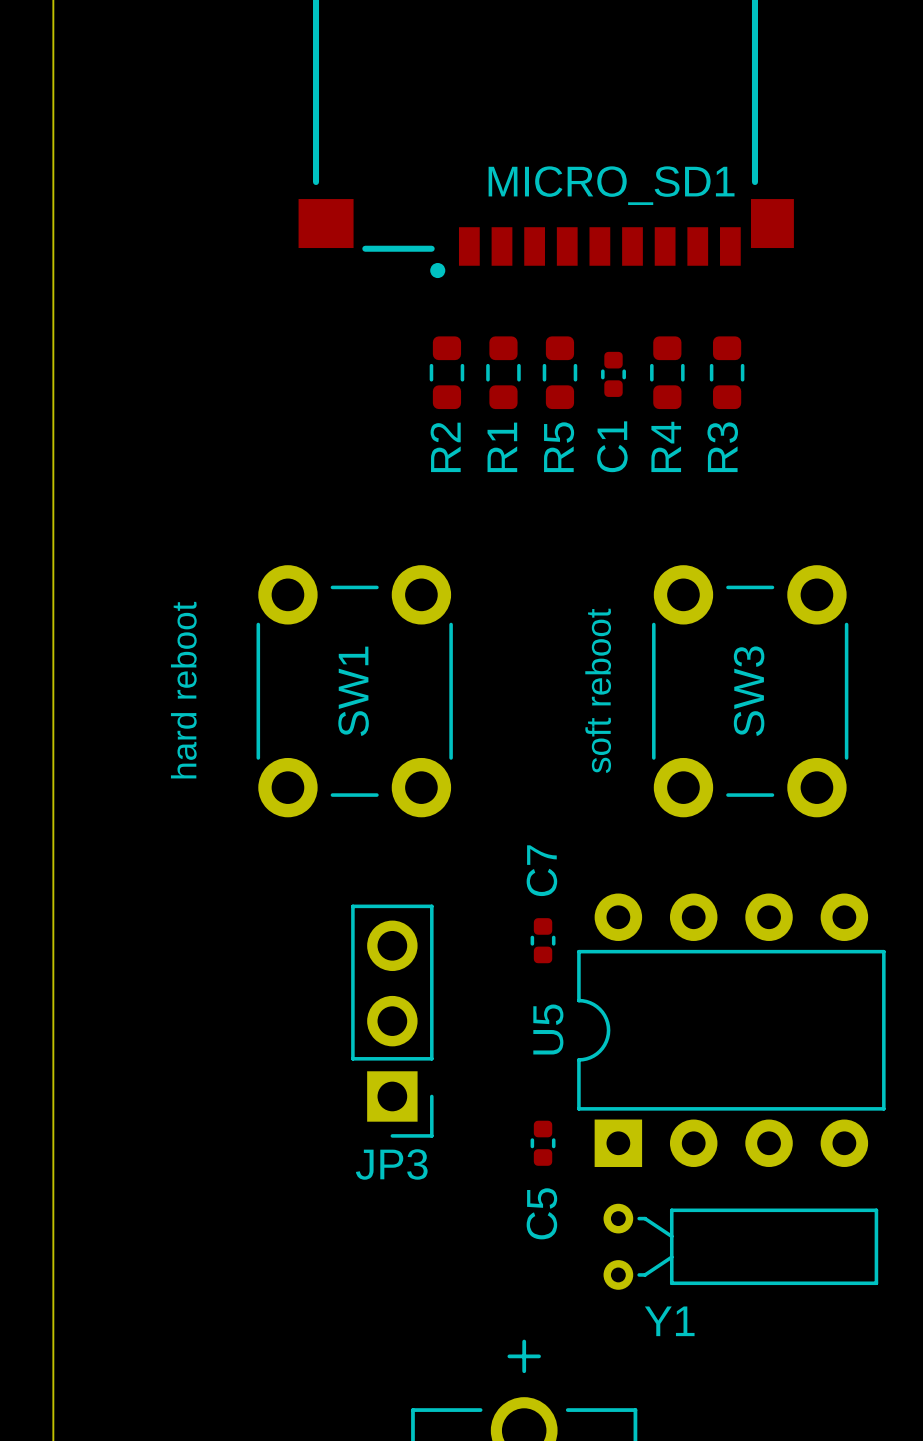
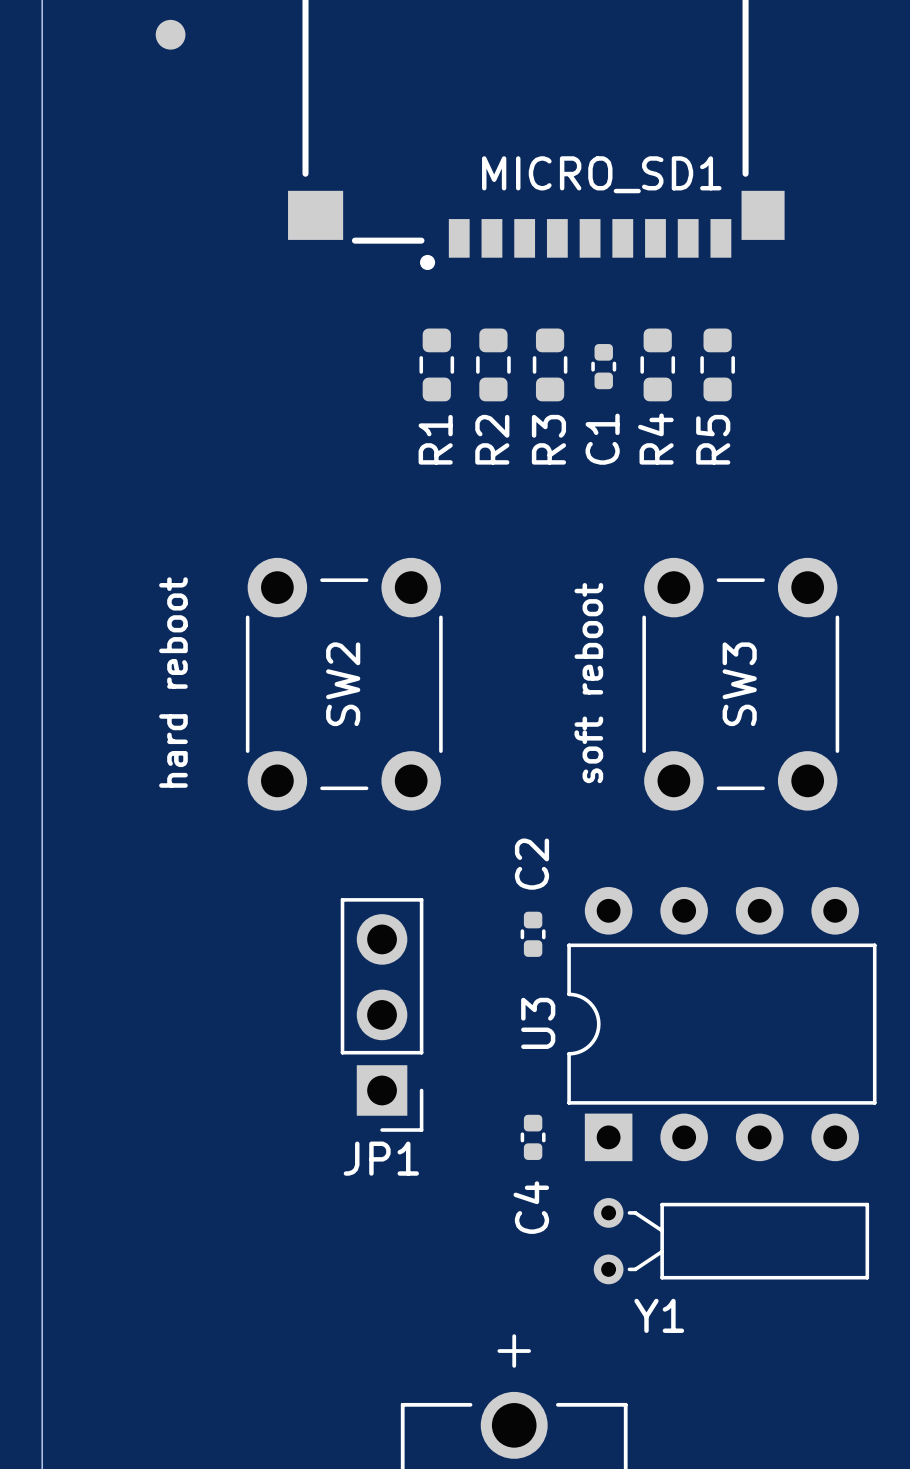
part: none -> (170, 34)
R2 name: R2 (445, 447) -> R1 (435, 439)
R1 name: R1 (502, 447) -> R2 (492, 439)
R5 name: R5 (559, 447) -> R3 (548, 439)
R3 name: R3 (722, 447) -> R5 (713, 439)
SW1 name: SW1 (353, 691) -> SW2 (343, 684)
C7 name: C7 (541, 870) -> C2 (531, 864)
U5 name: U5 (548, 1029) -> U3 (538, 1023)
JP3 name: JP3 (391, 1164) -> JP1 (381, 1158)
C5 name: C5 (541, 1213) -> C4 (531, 1207)

